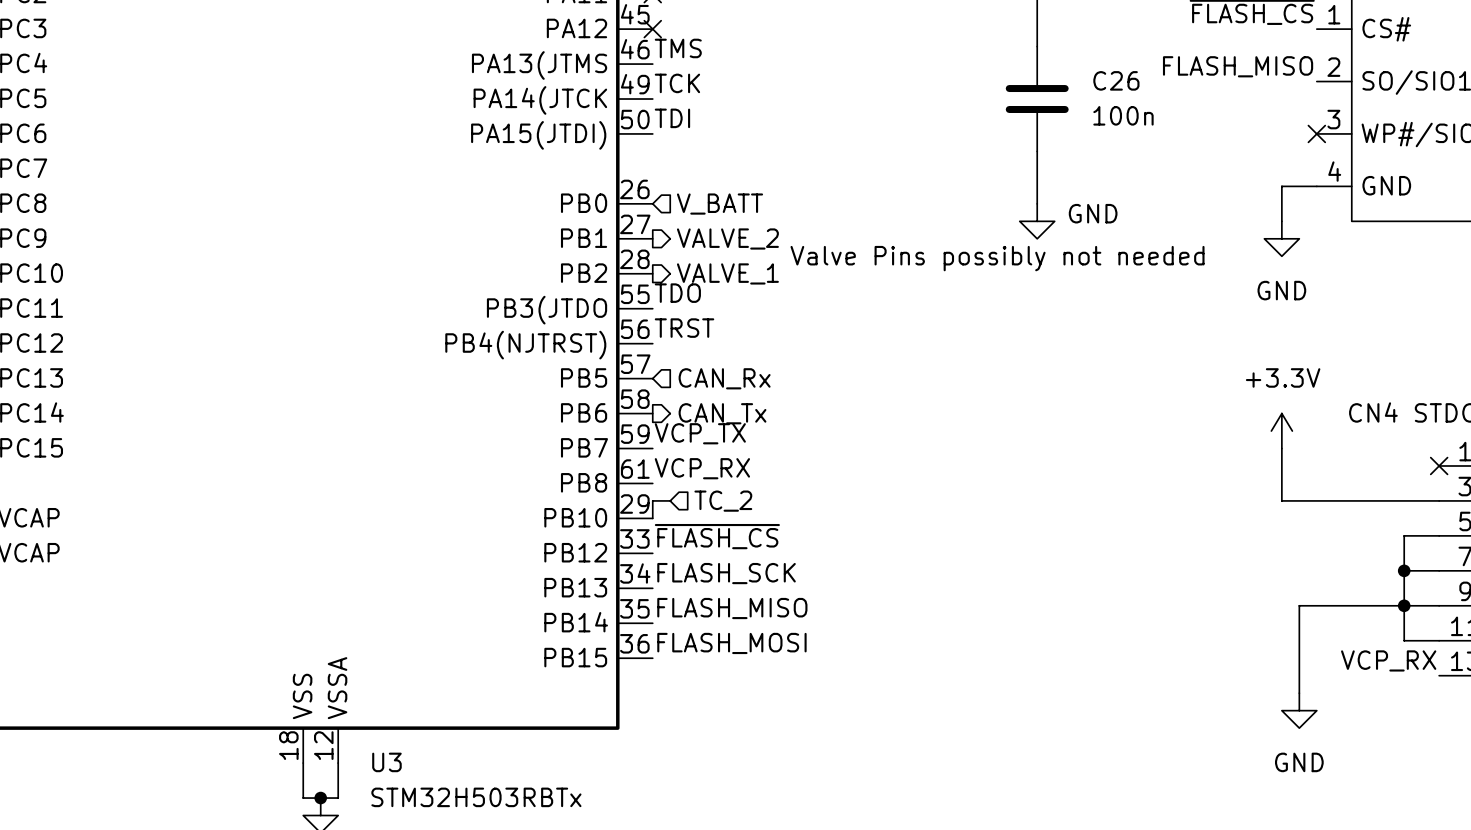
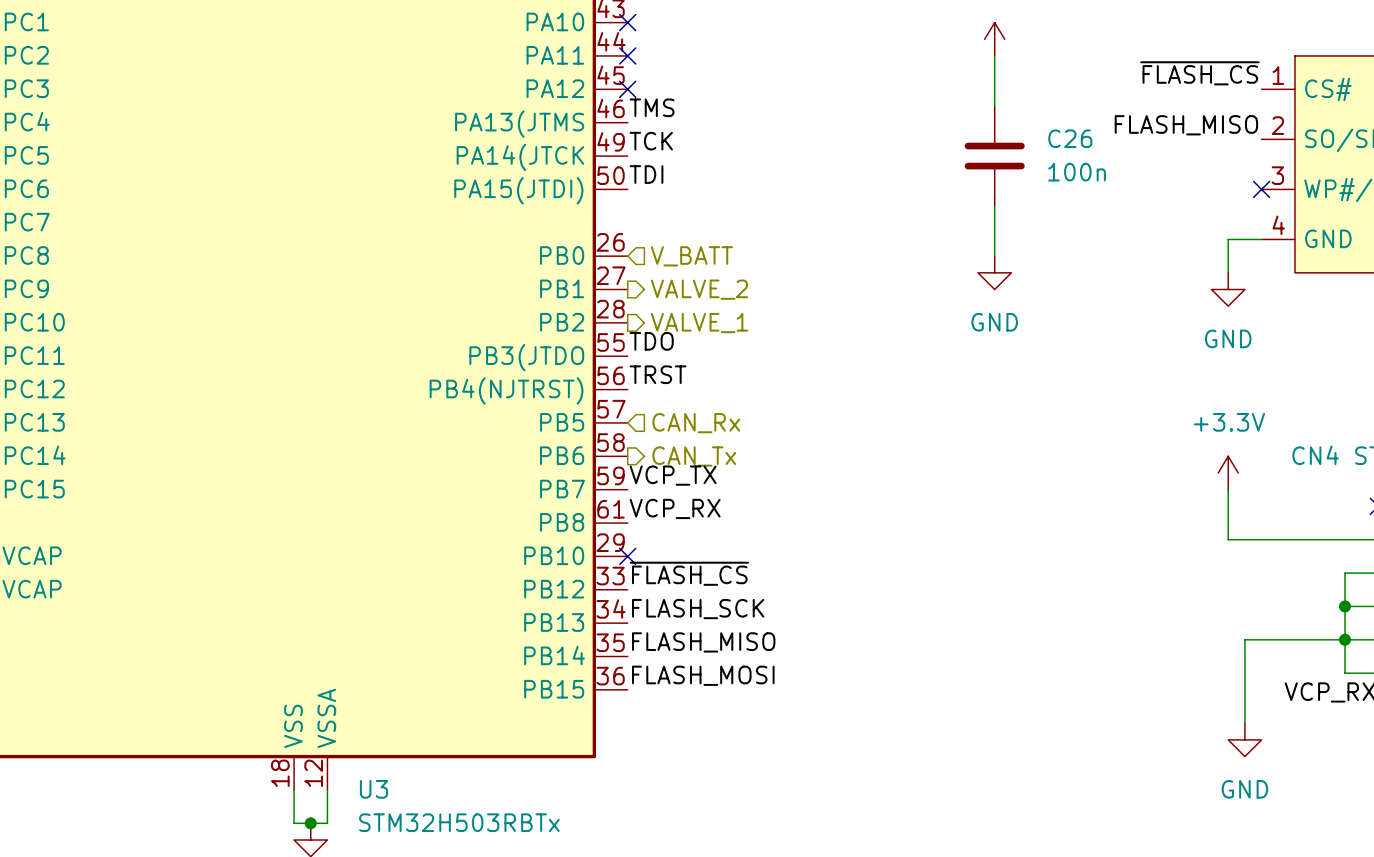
power symbol text position: GND (1093, 213) -> GND (994, 322)
text: Valve Pins possibly not needed (997, 258) -> none
wire: (670, 500) (652, 500) (652, 518) -> none
hierarchical label: TC_2 (723, 501) -> none
no-connect mark: none -> (627, 556)

